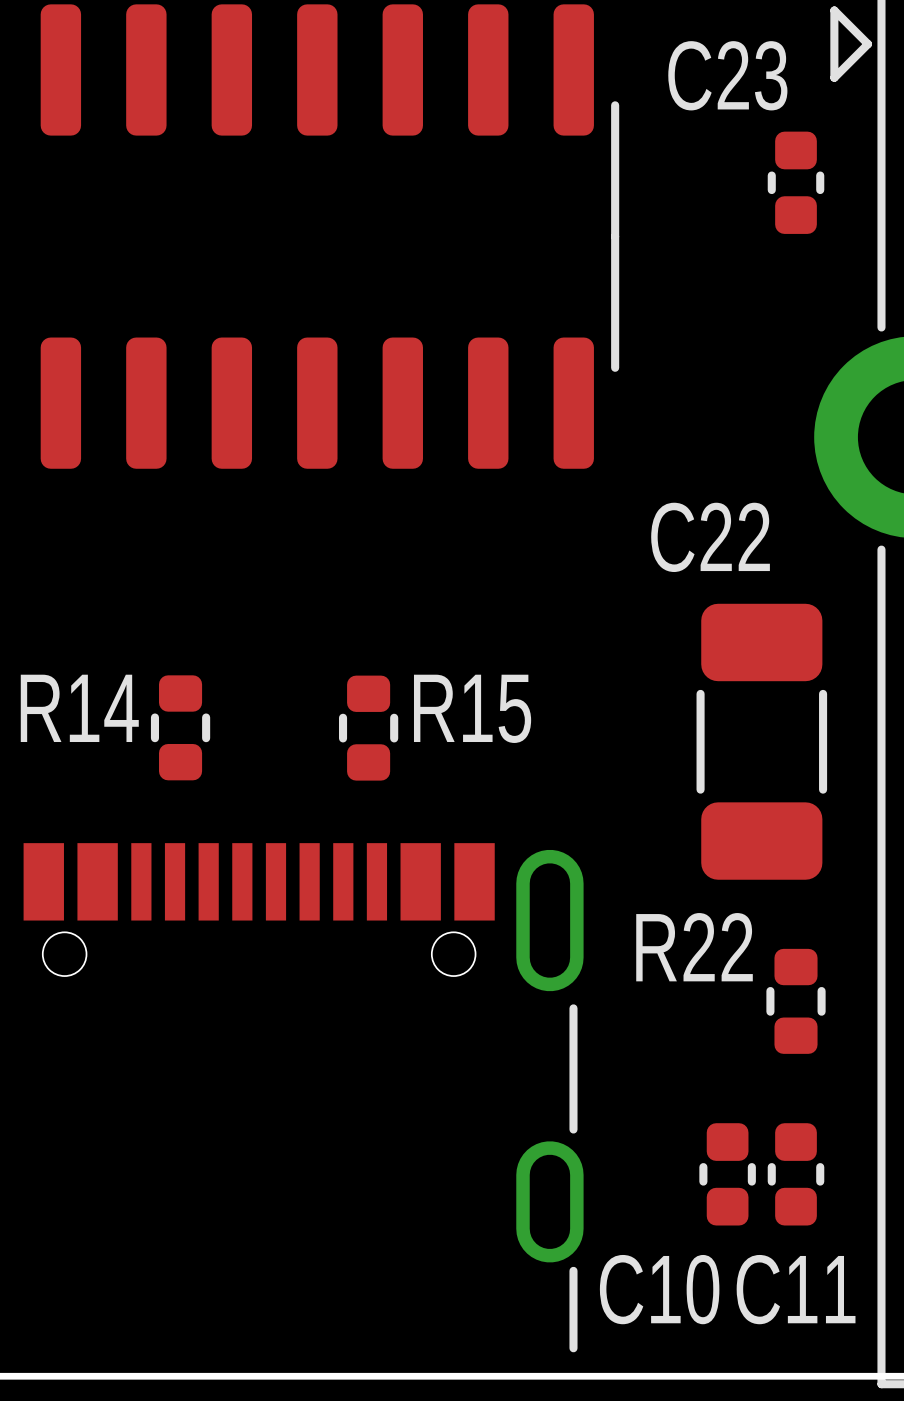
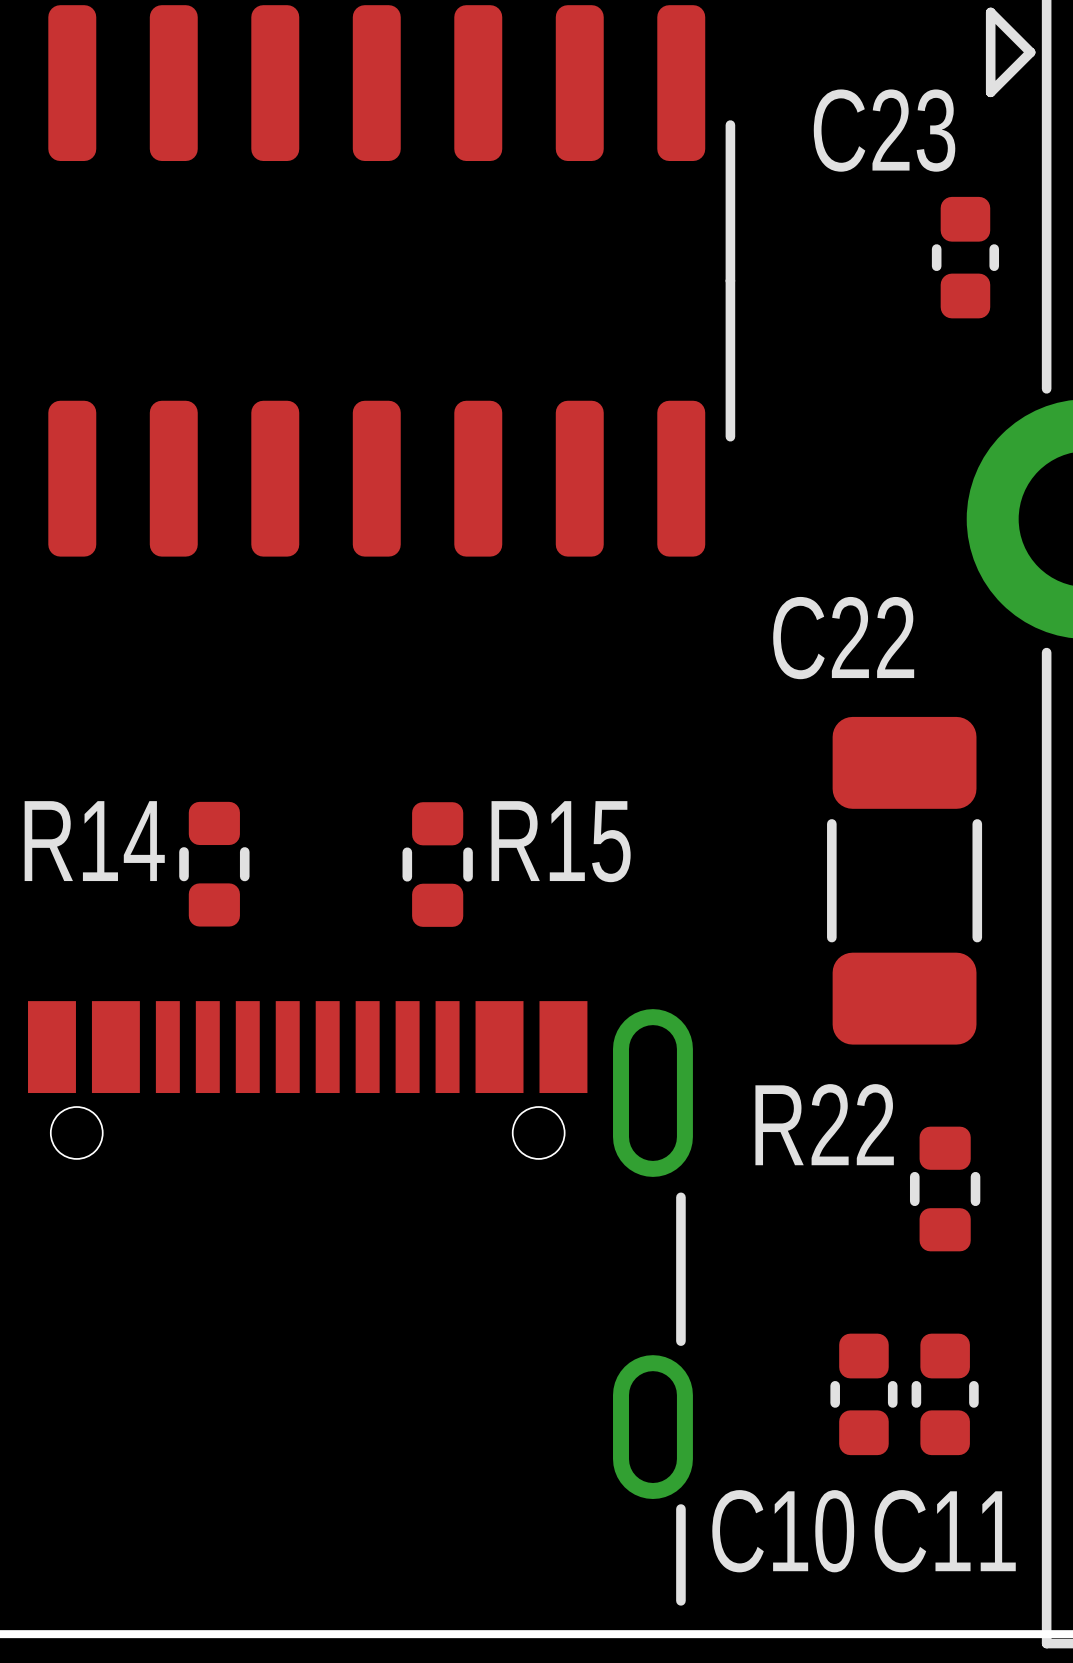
C23 position: (796, 182) -> (965, 257)

